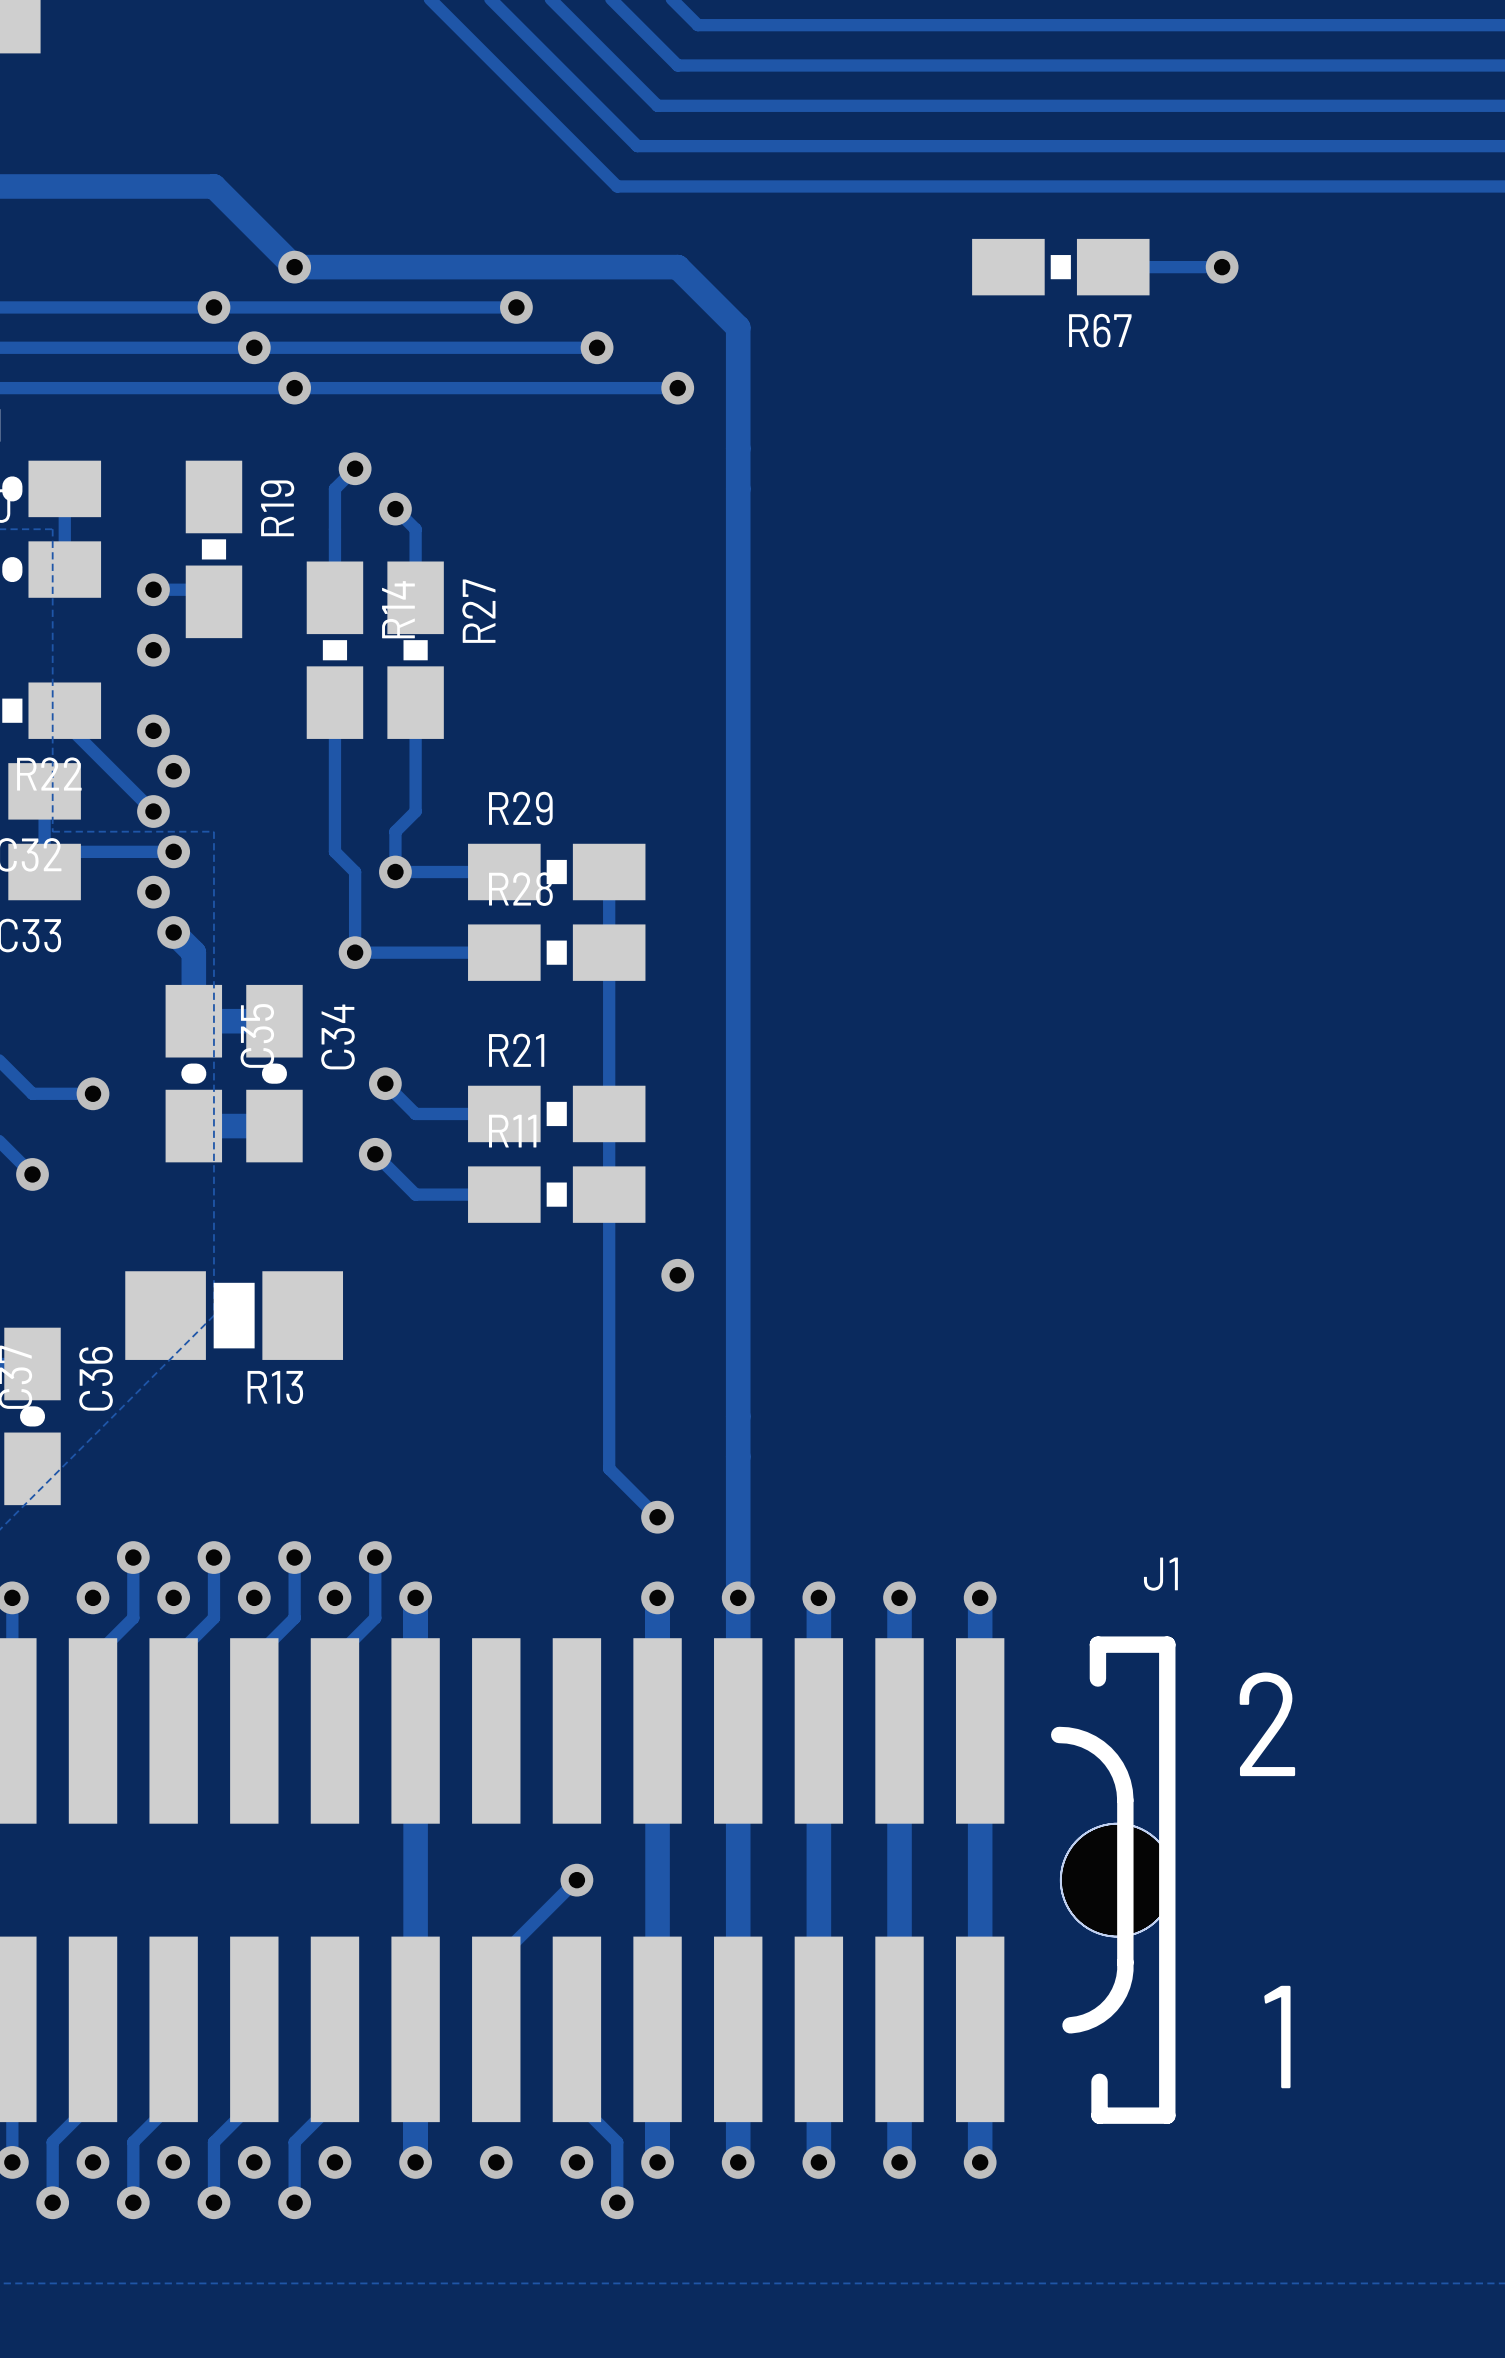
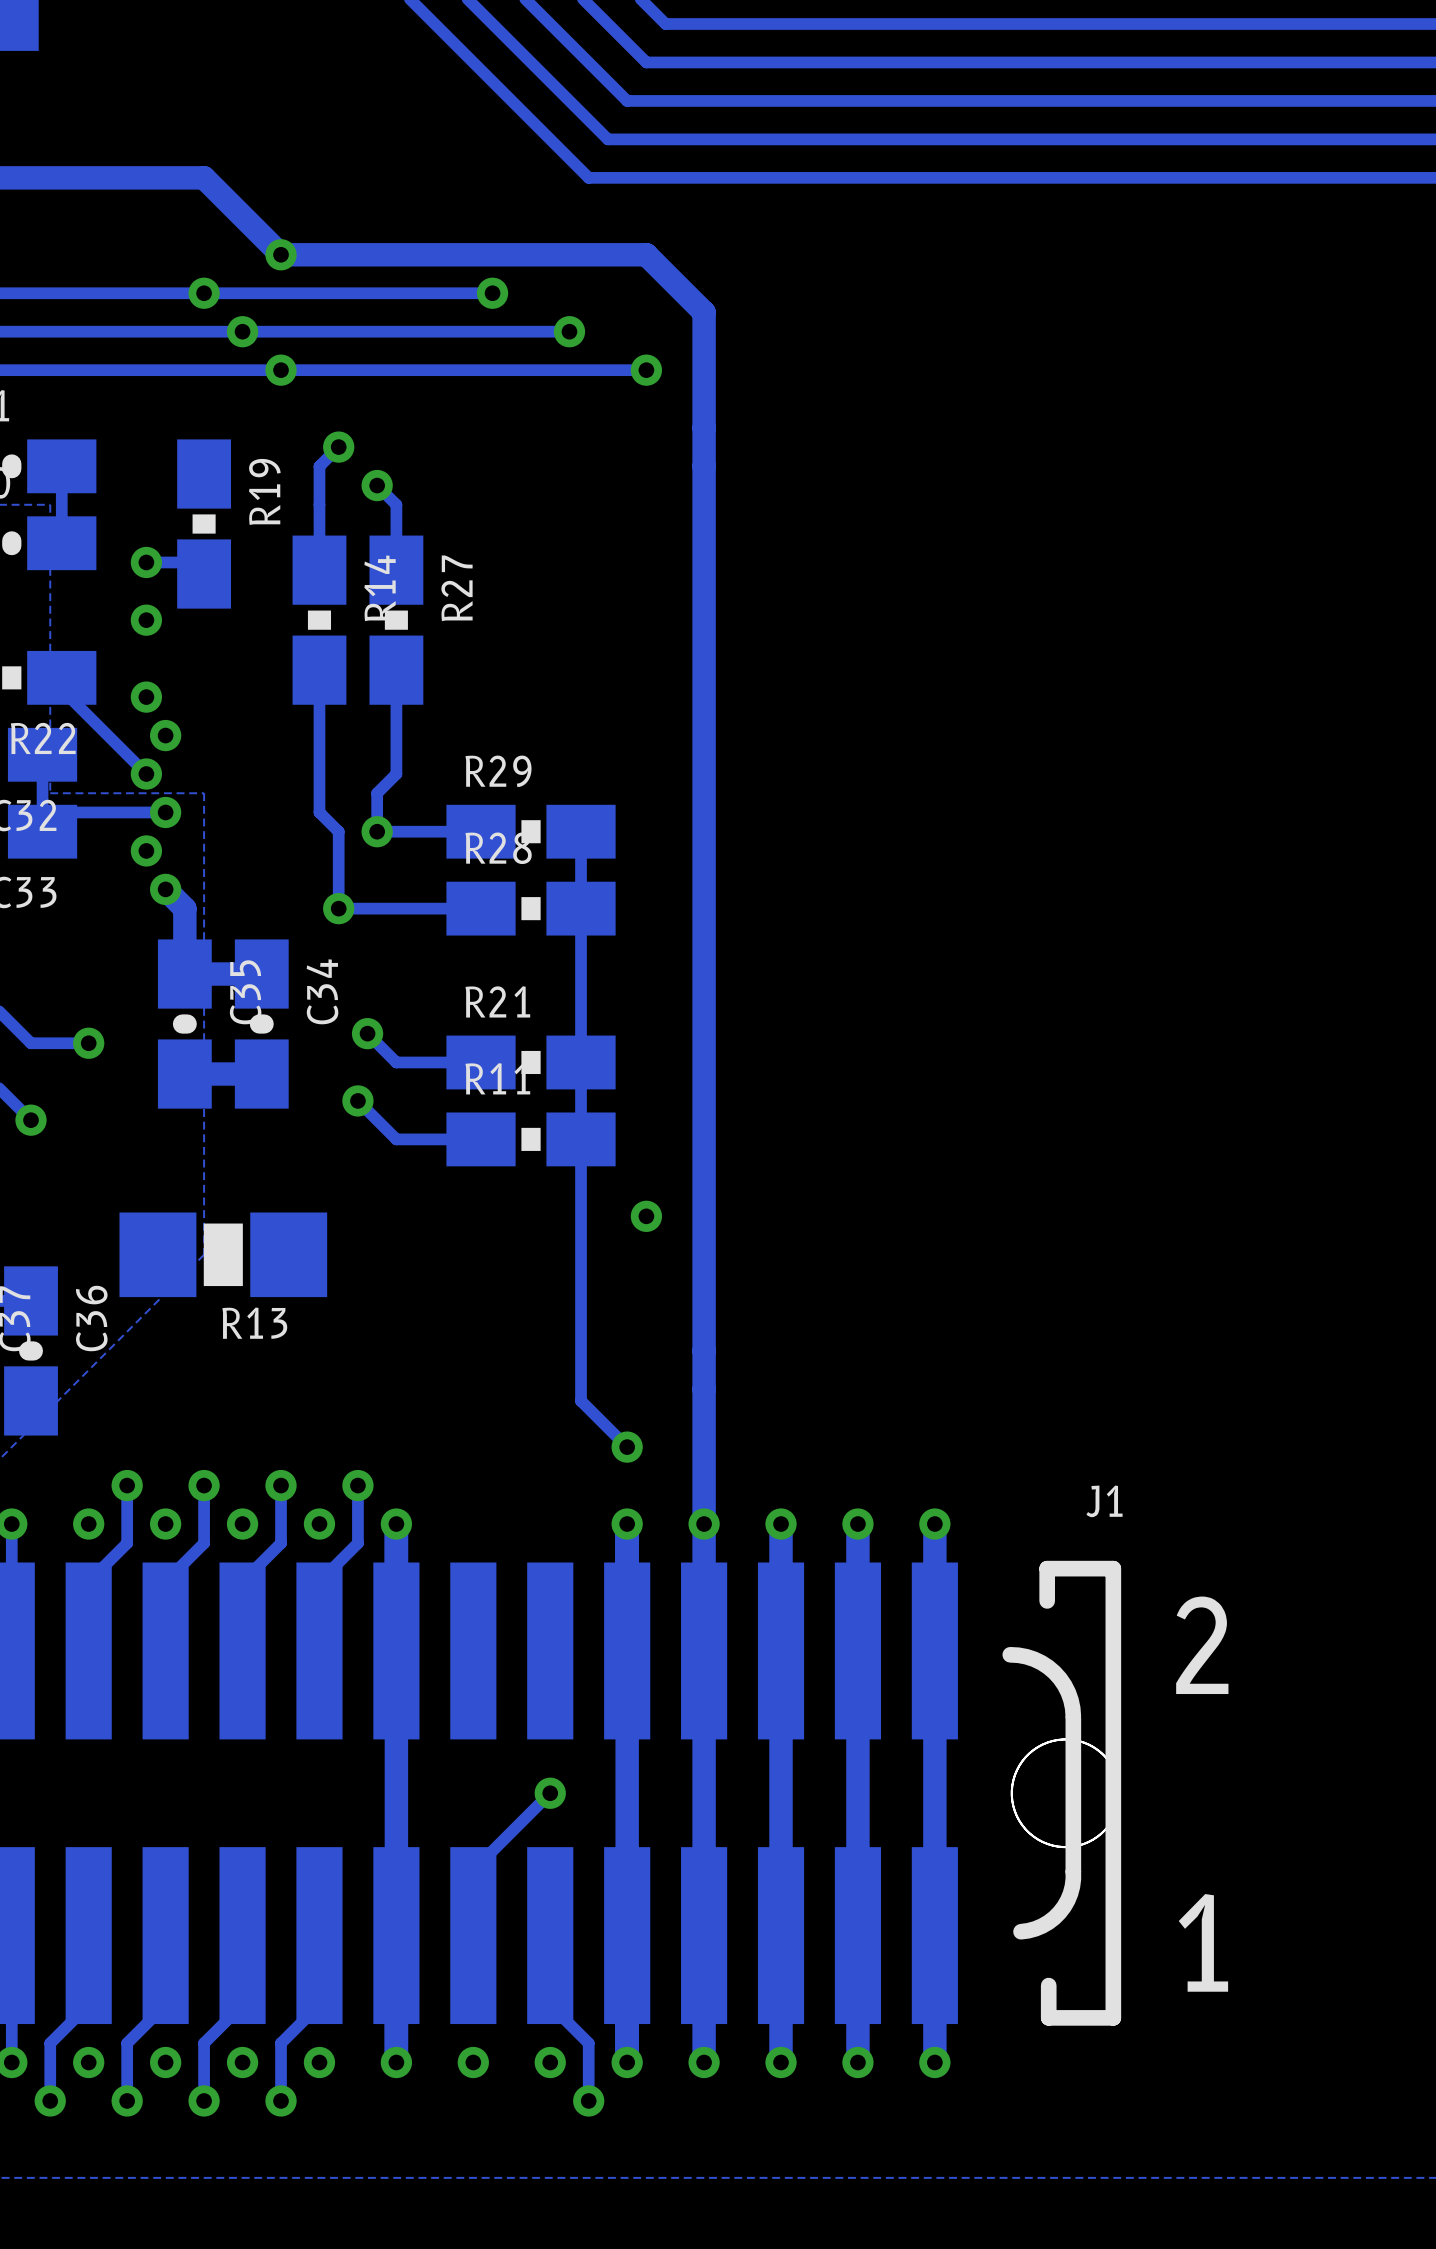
R67: (1060, 267) -> none
track: (1222, 267) (1113, 267) -> none
via: (1222, 267) -> none

